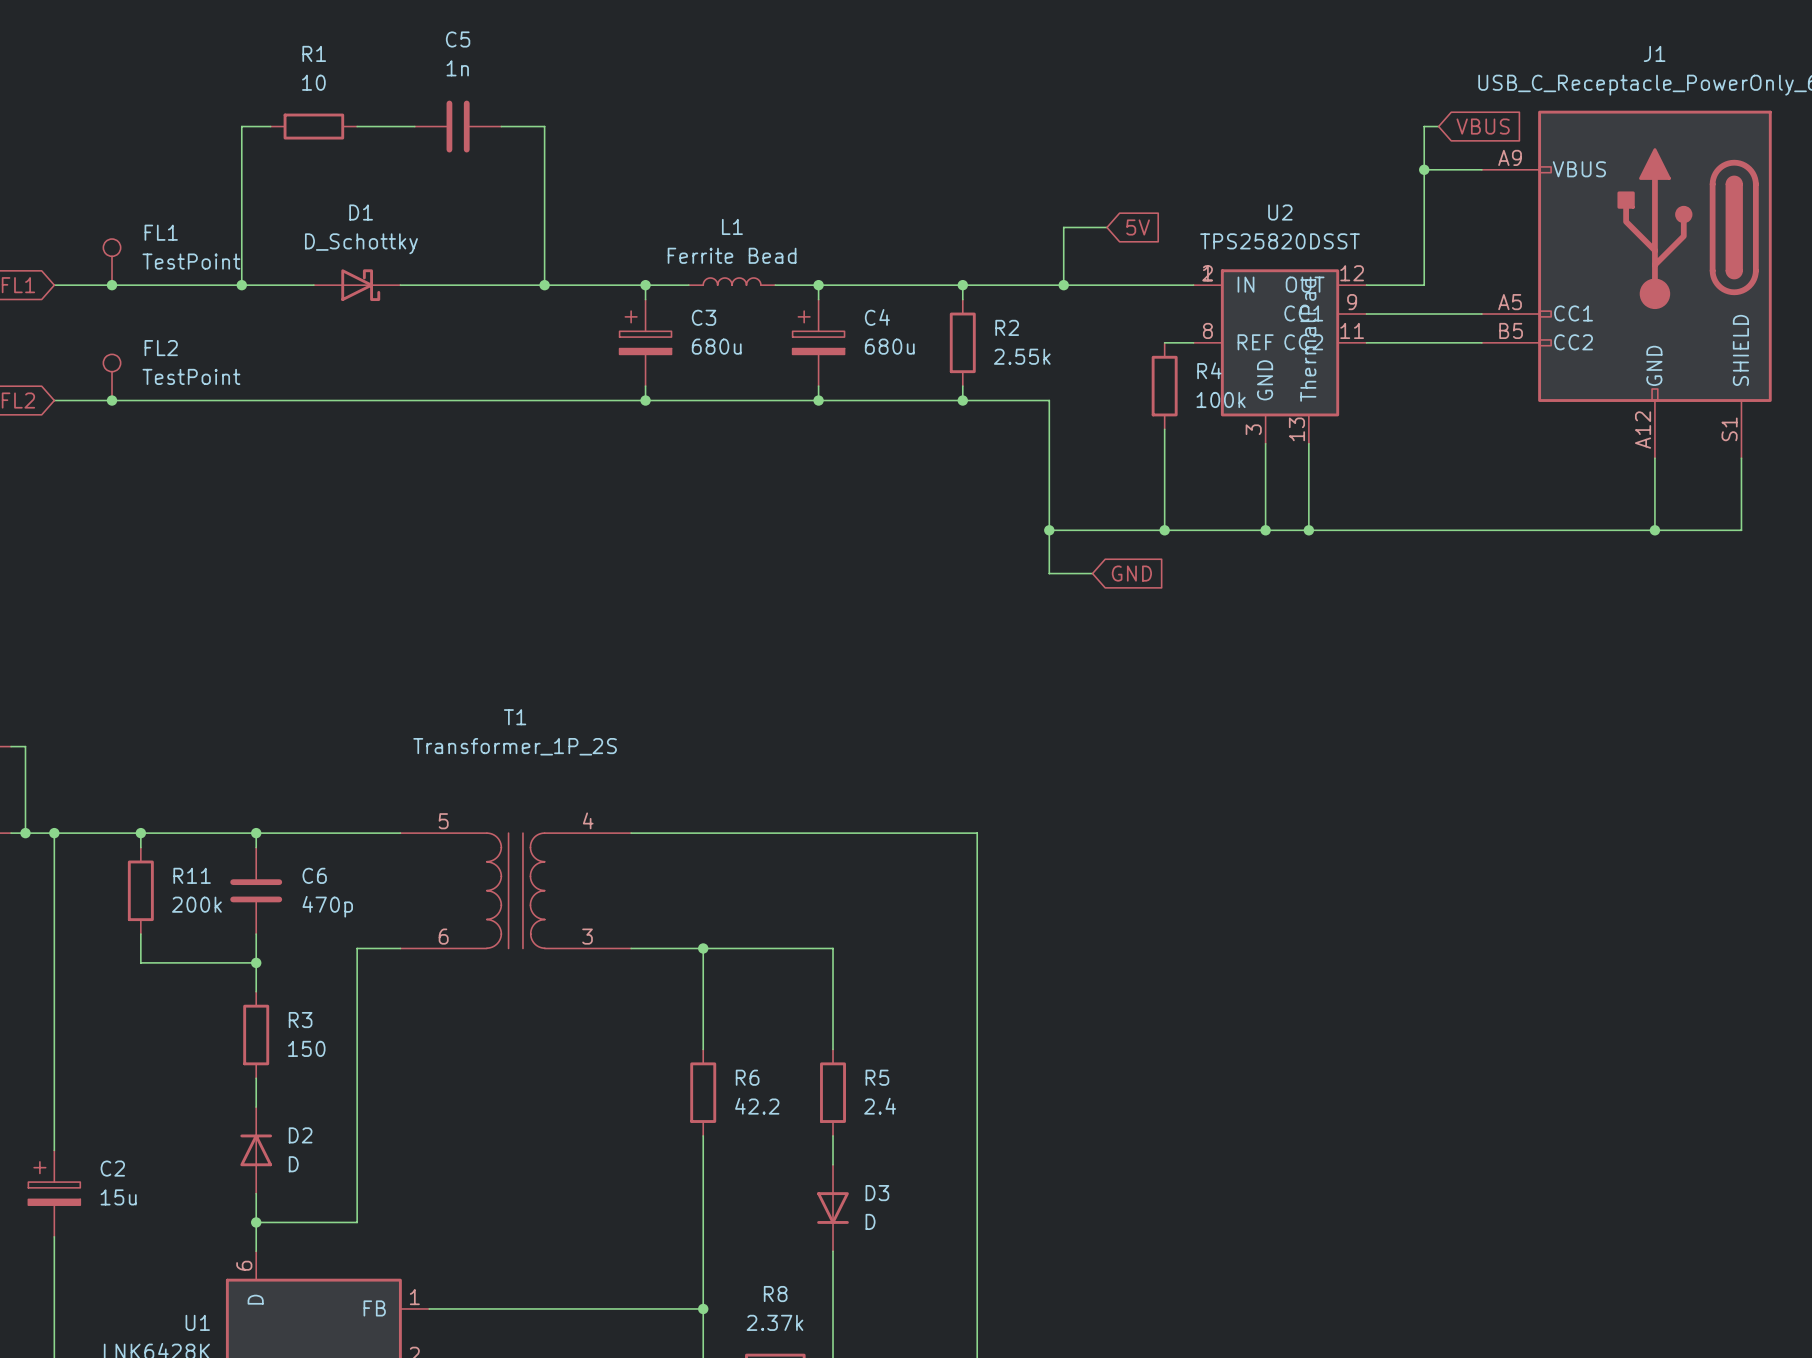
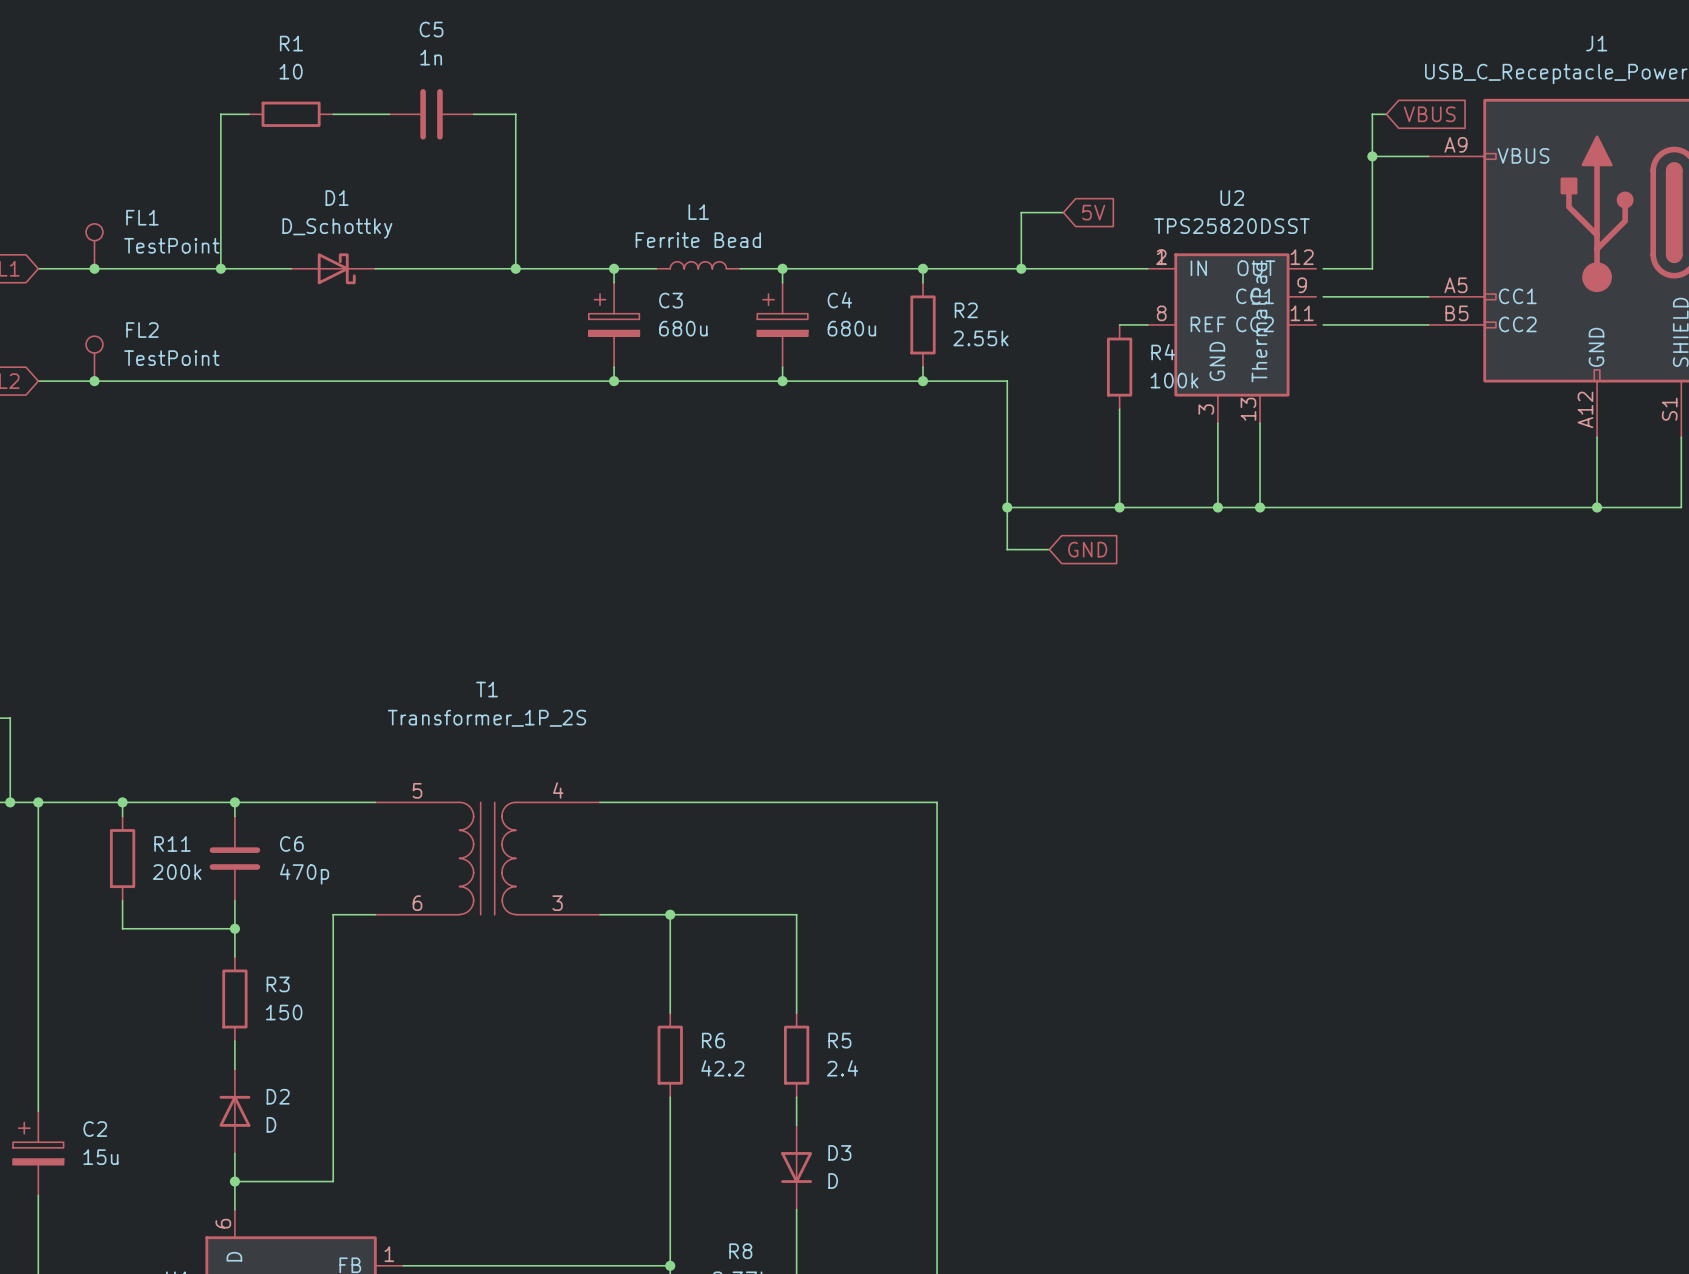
wire: (1366, 285) (1373, 285) -> none
wire: (1366, 314) (1373, 314) -> none
wire: (1366, 342) (1373, 342) -> none

